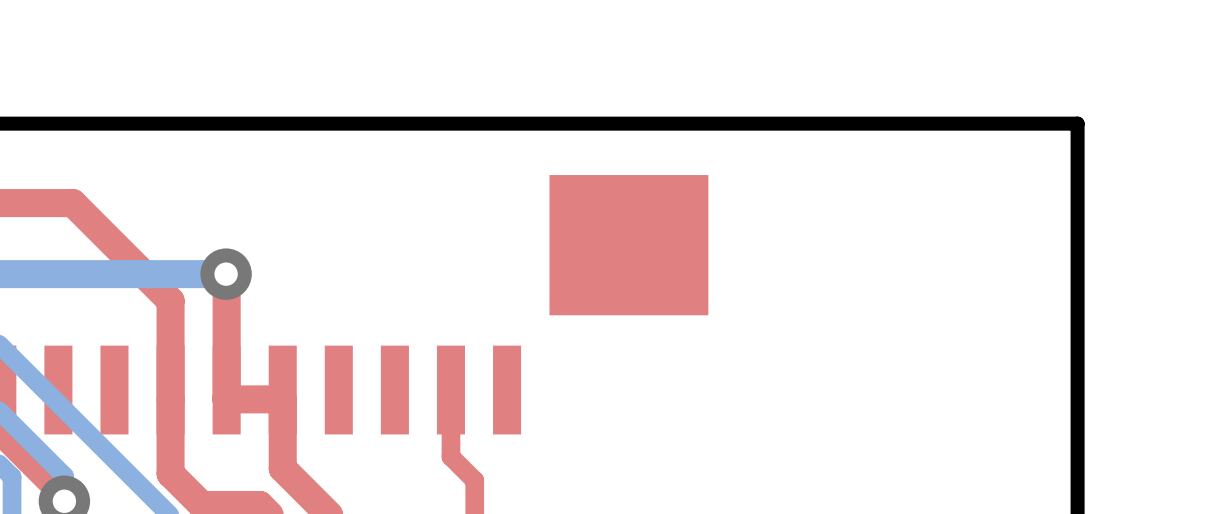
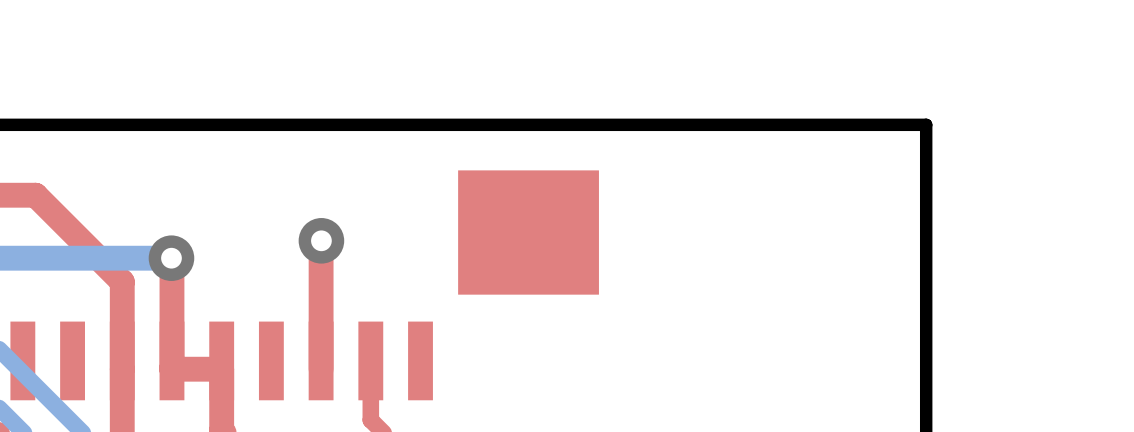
top track: none -> (321, 241) (321, 369)
via: none -> (321, 240)

